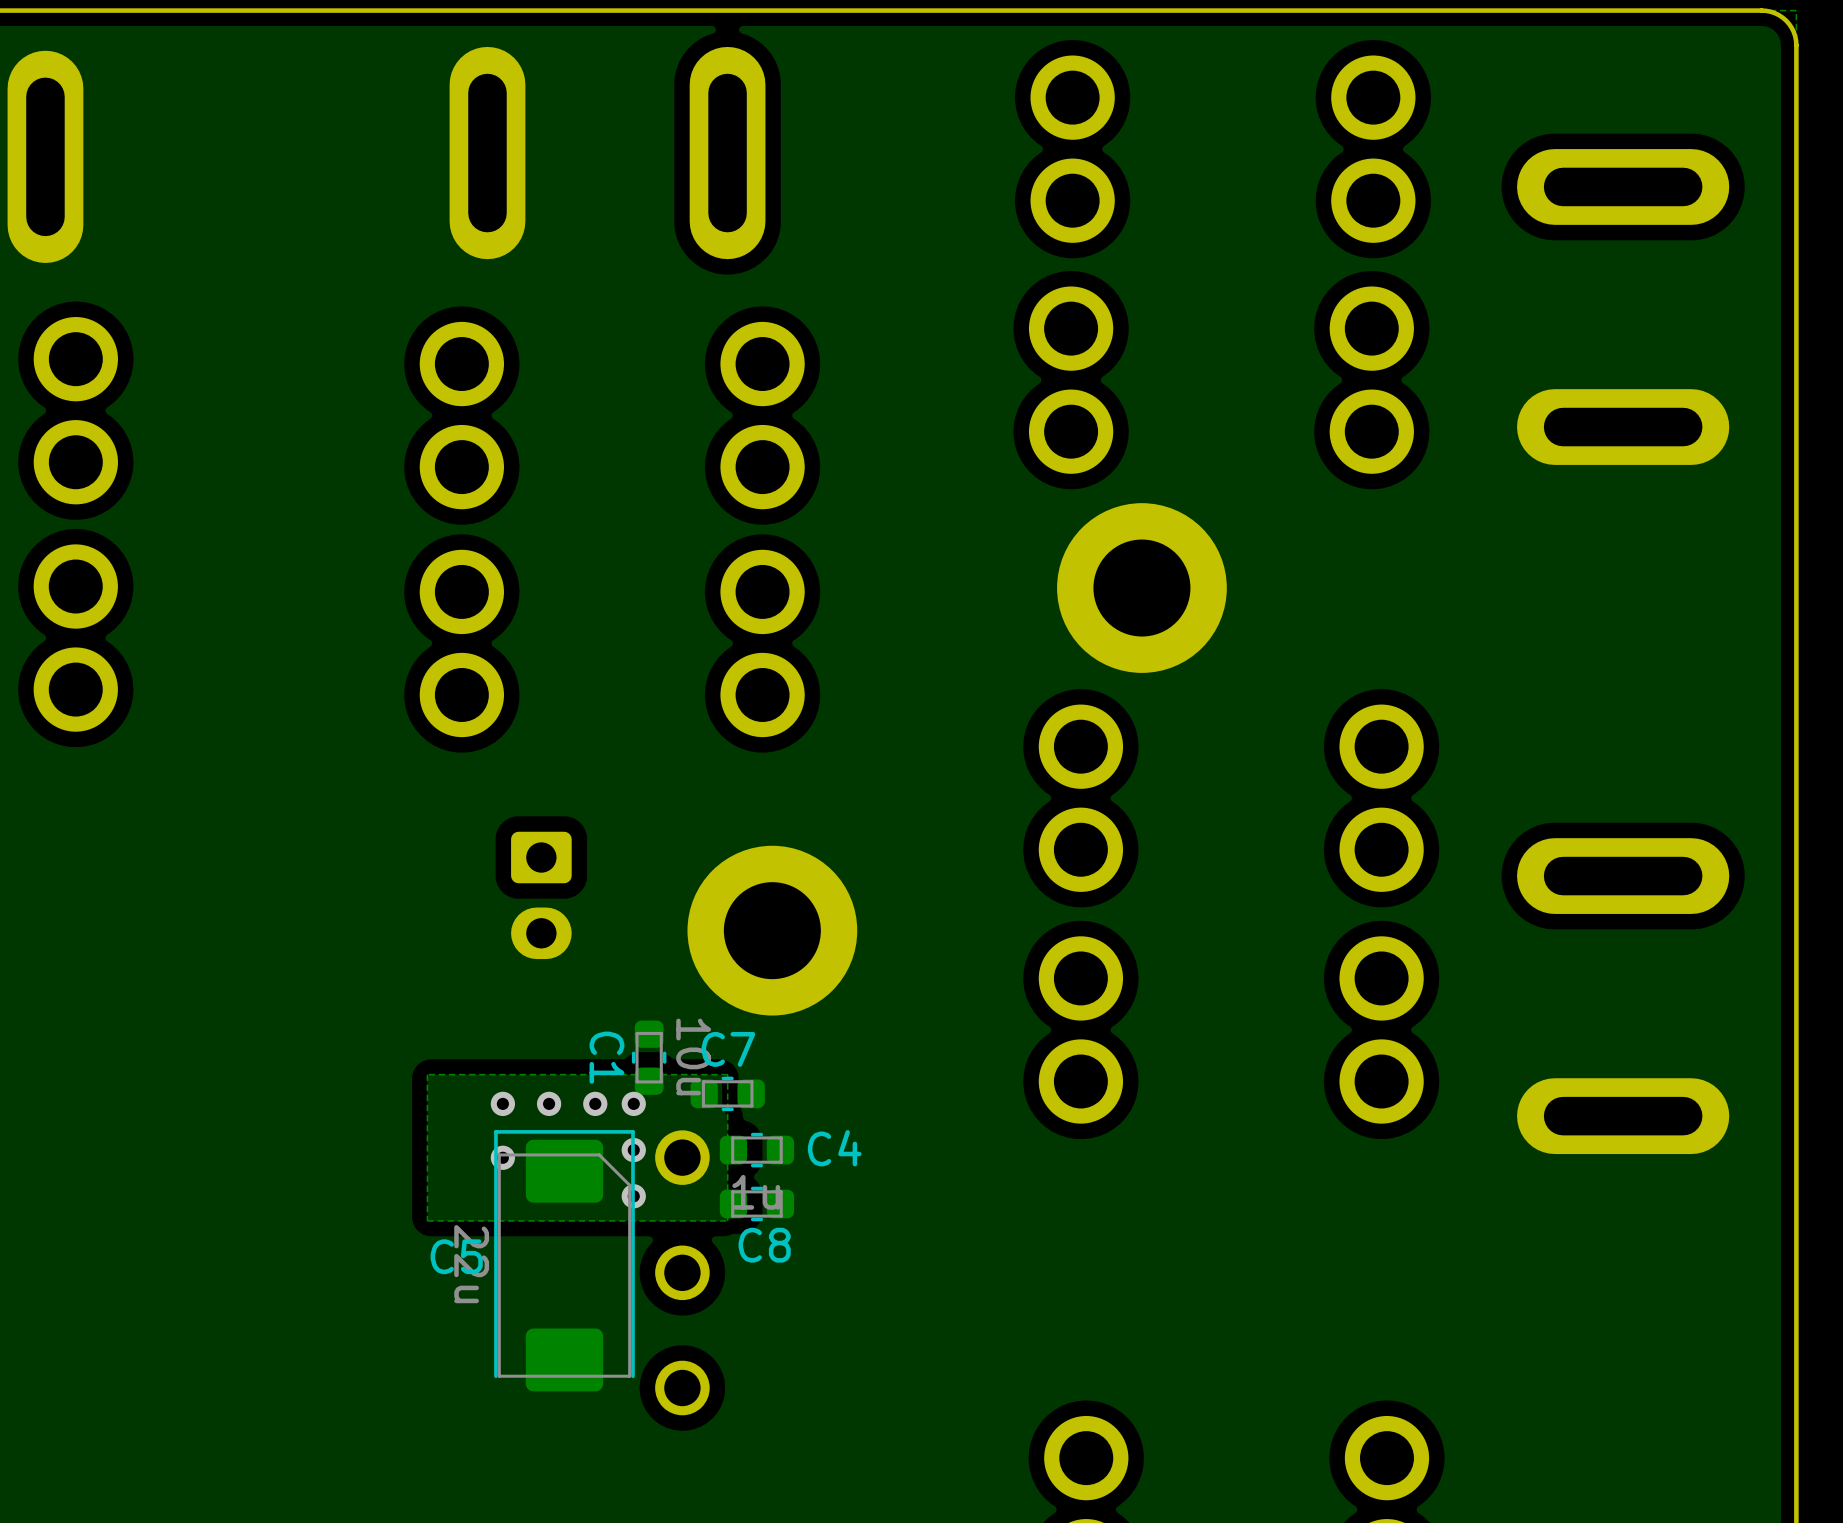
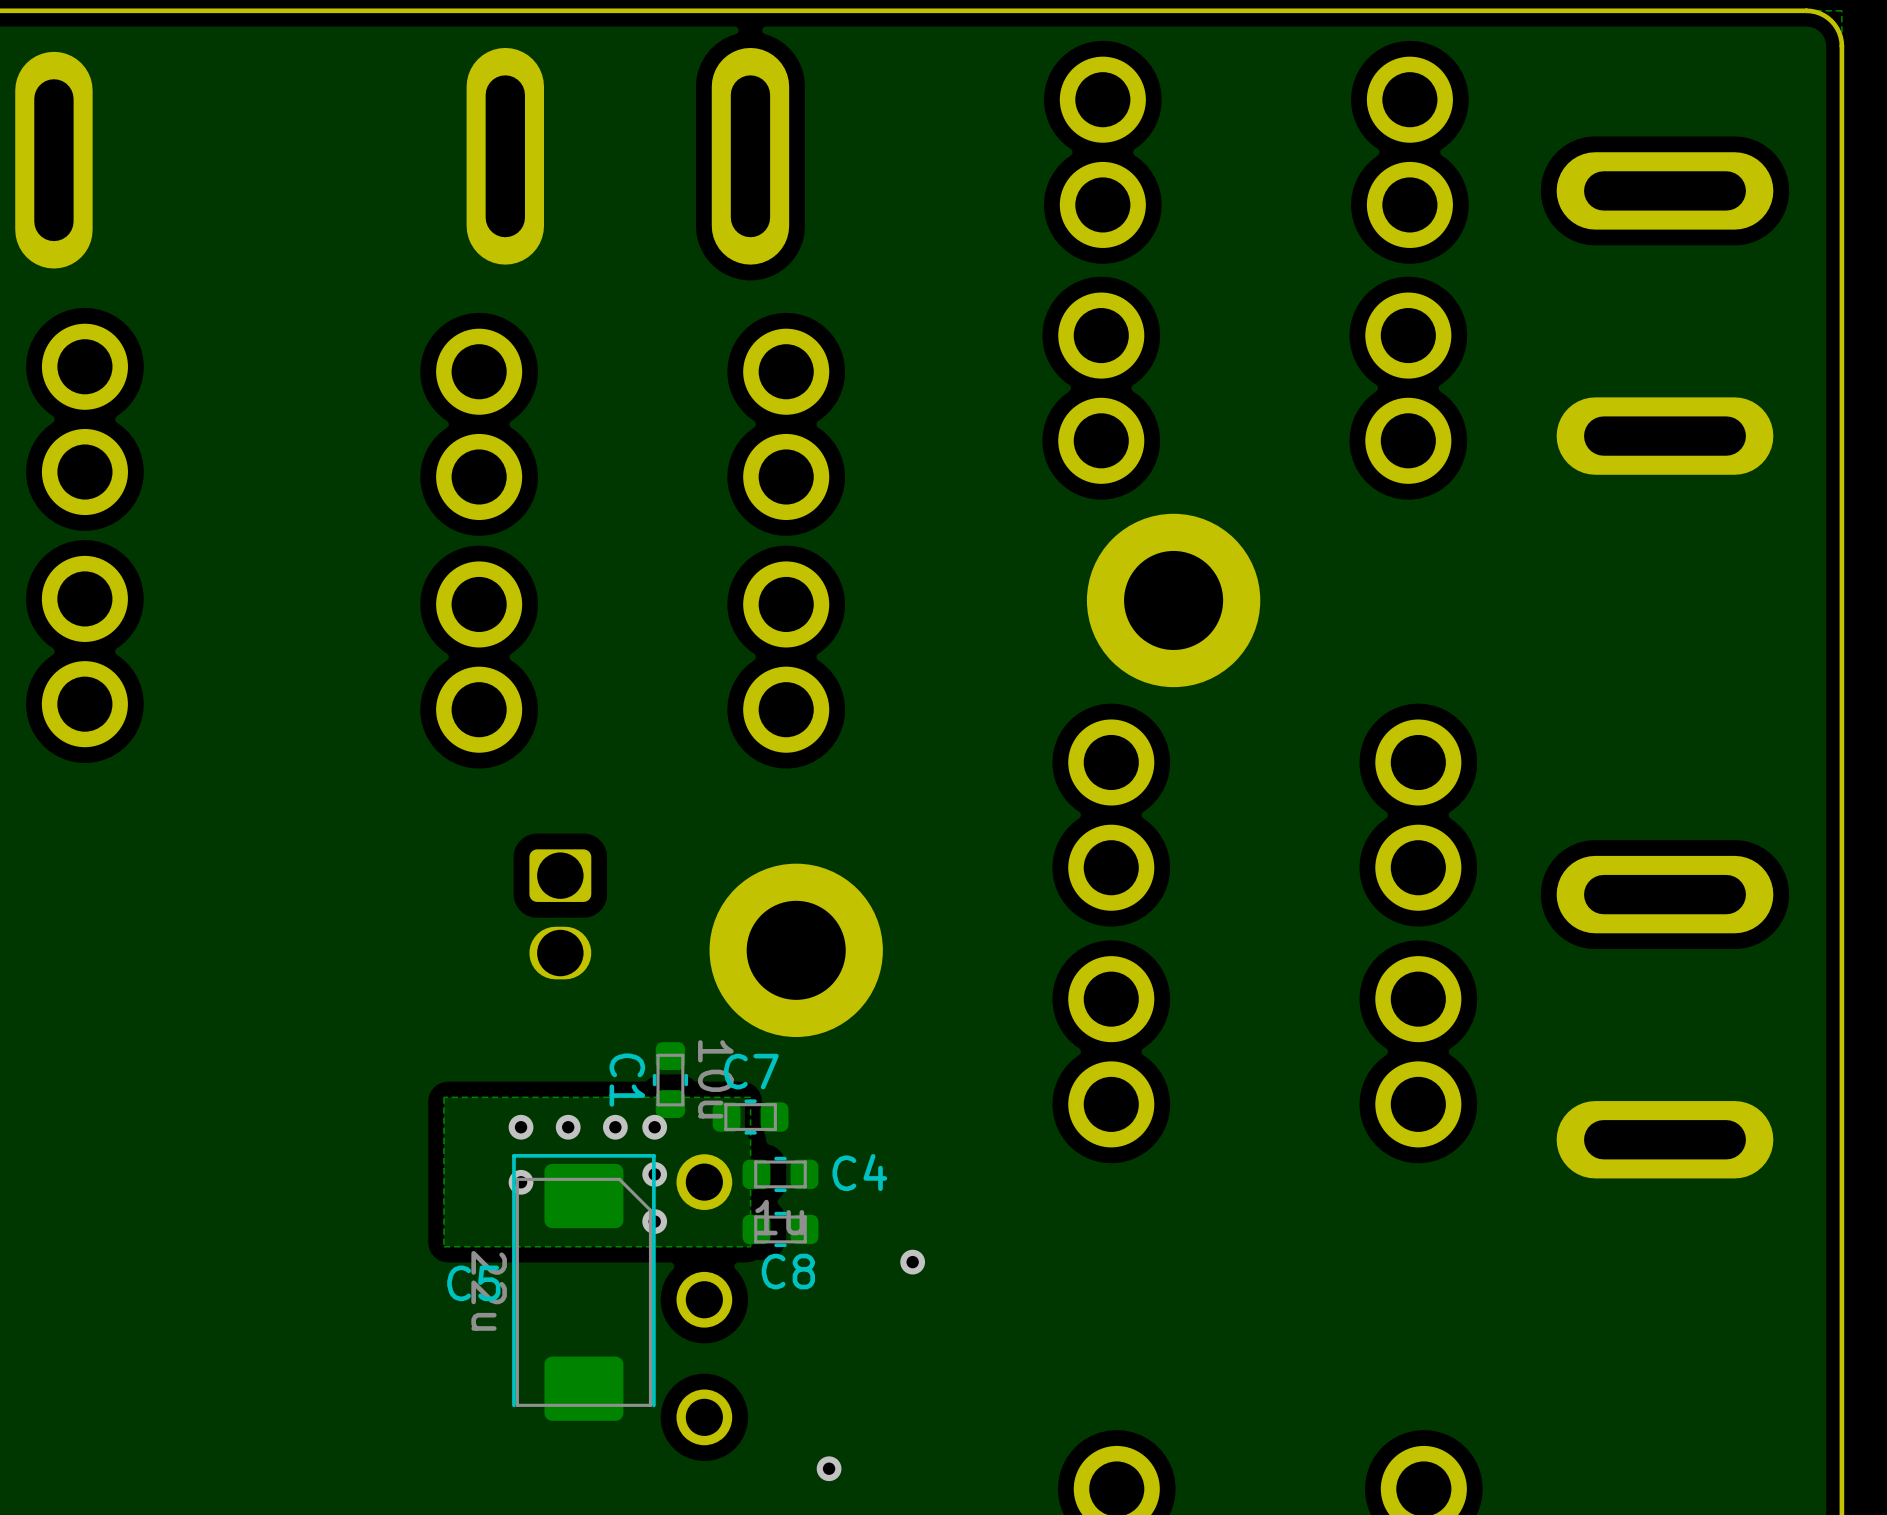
part footprint: [511, 831, 572, 960] -> [529, 849, 592, 980]
via: none -> (912, 1262)
via: none -> (829, 1468)

